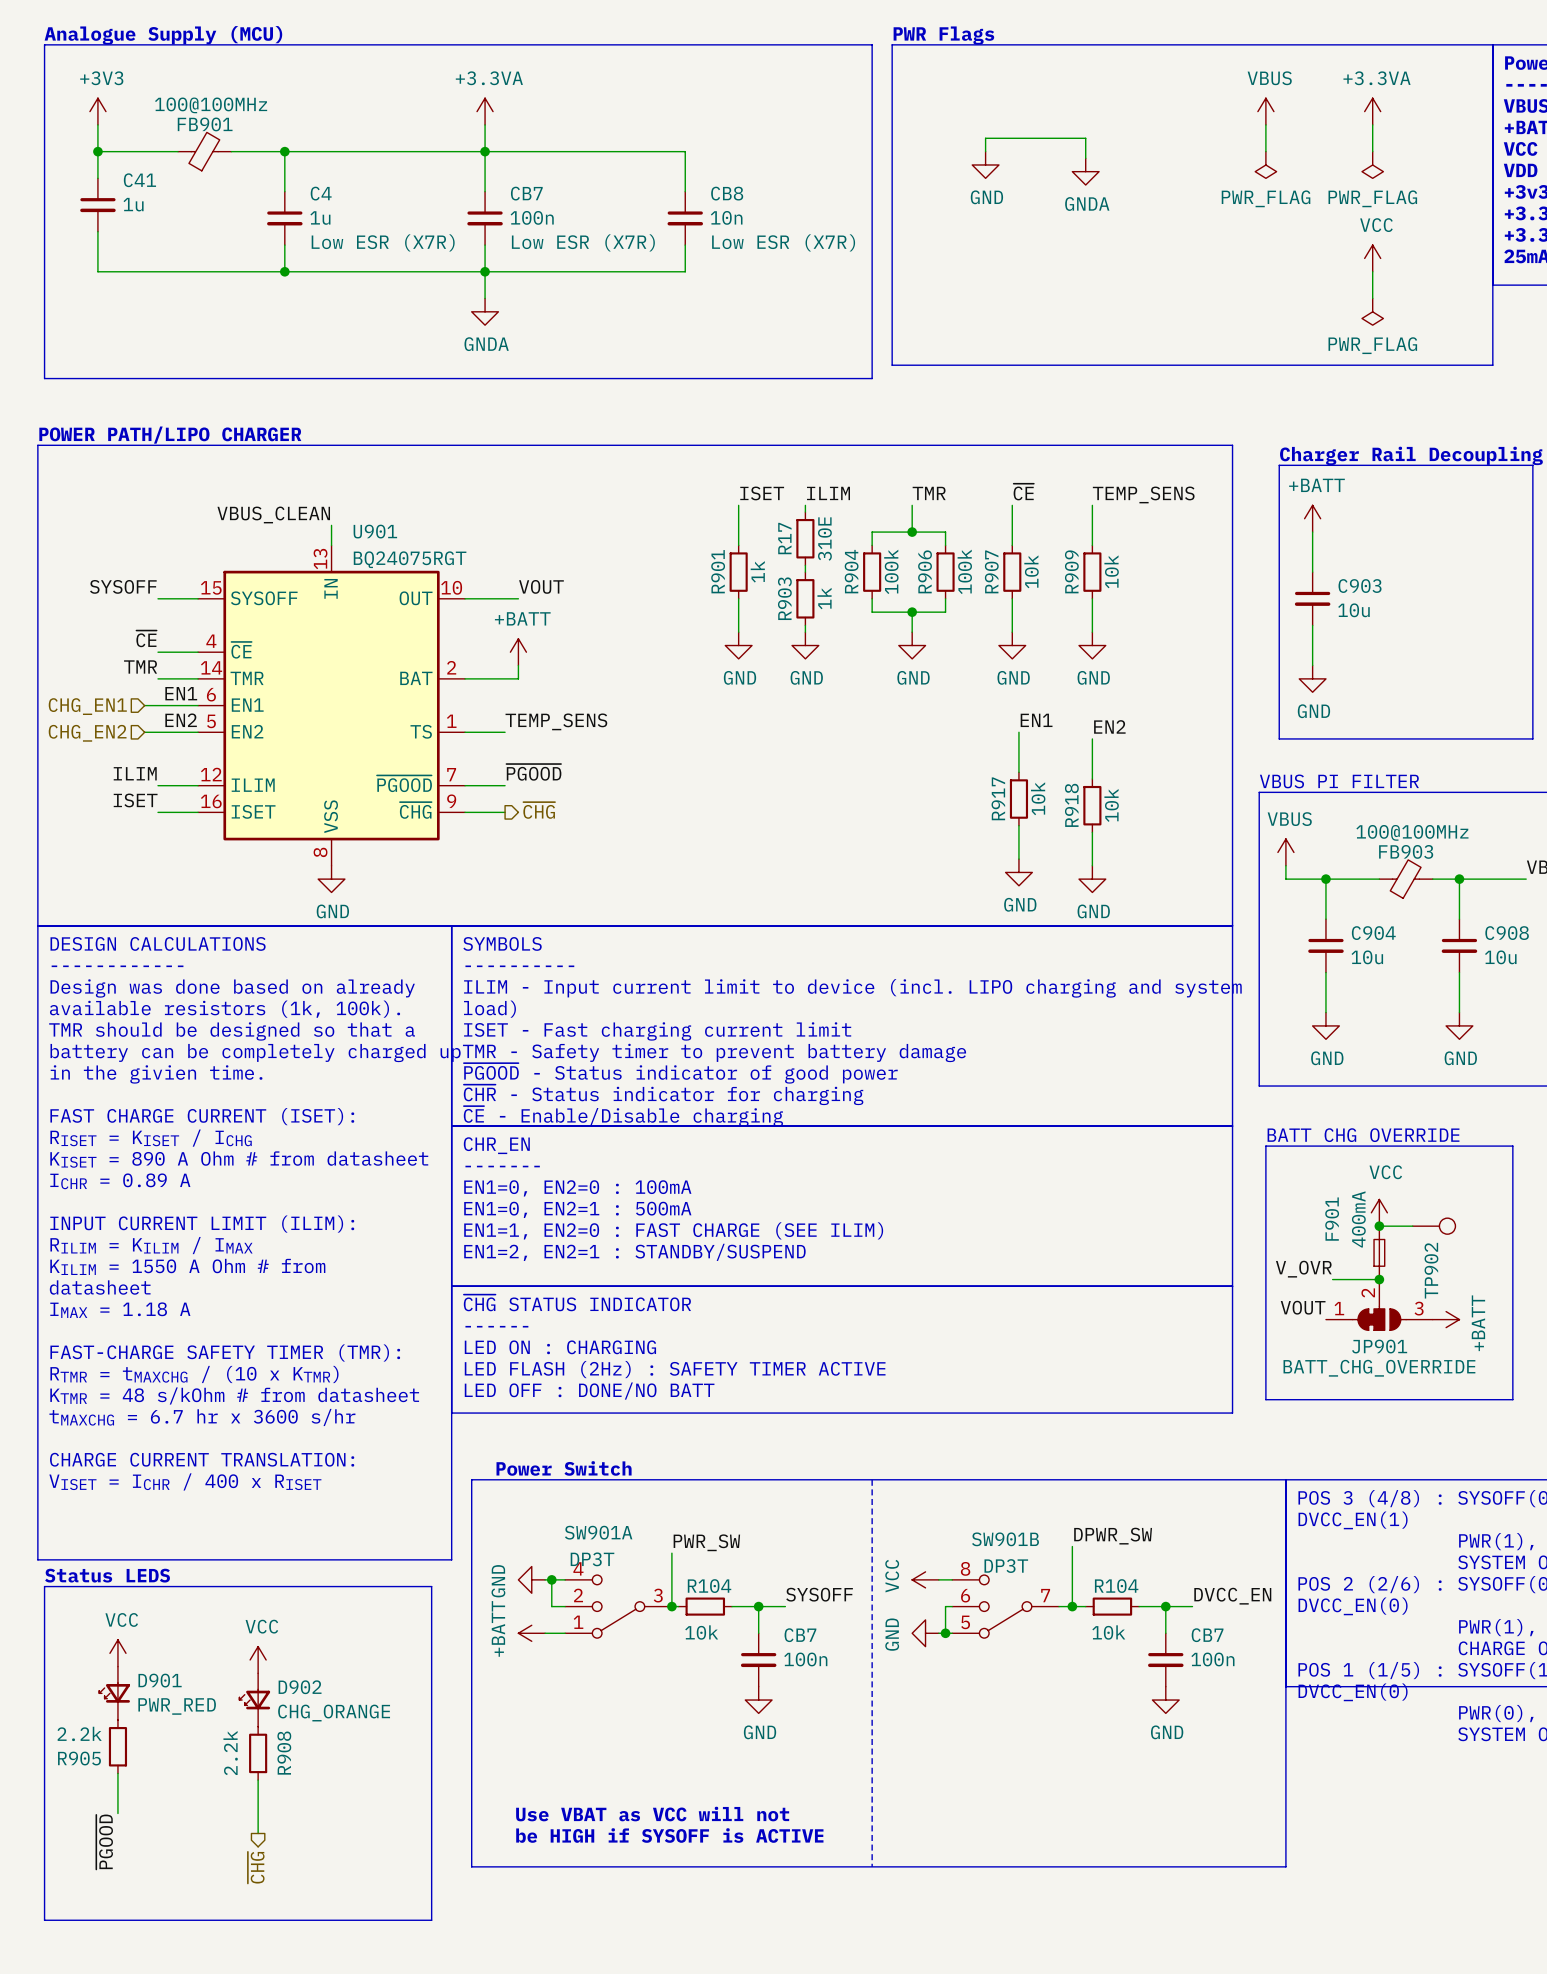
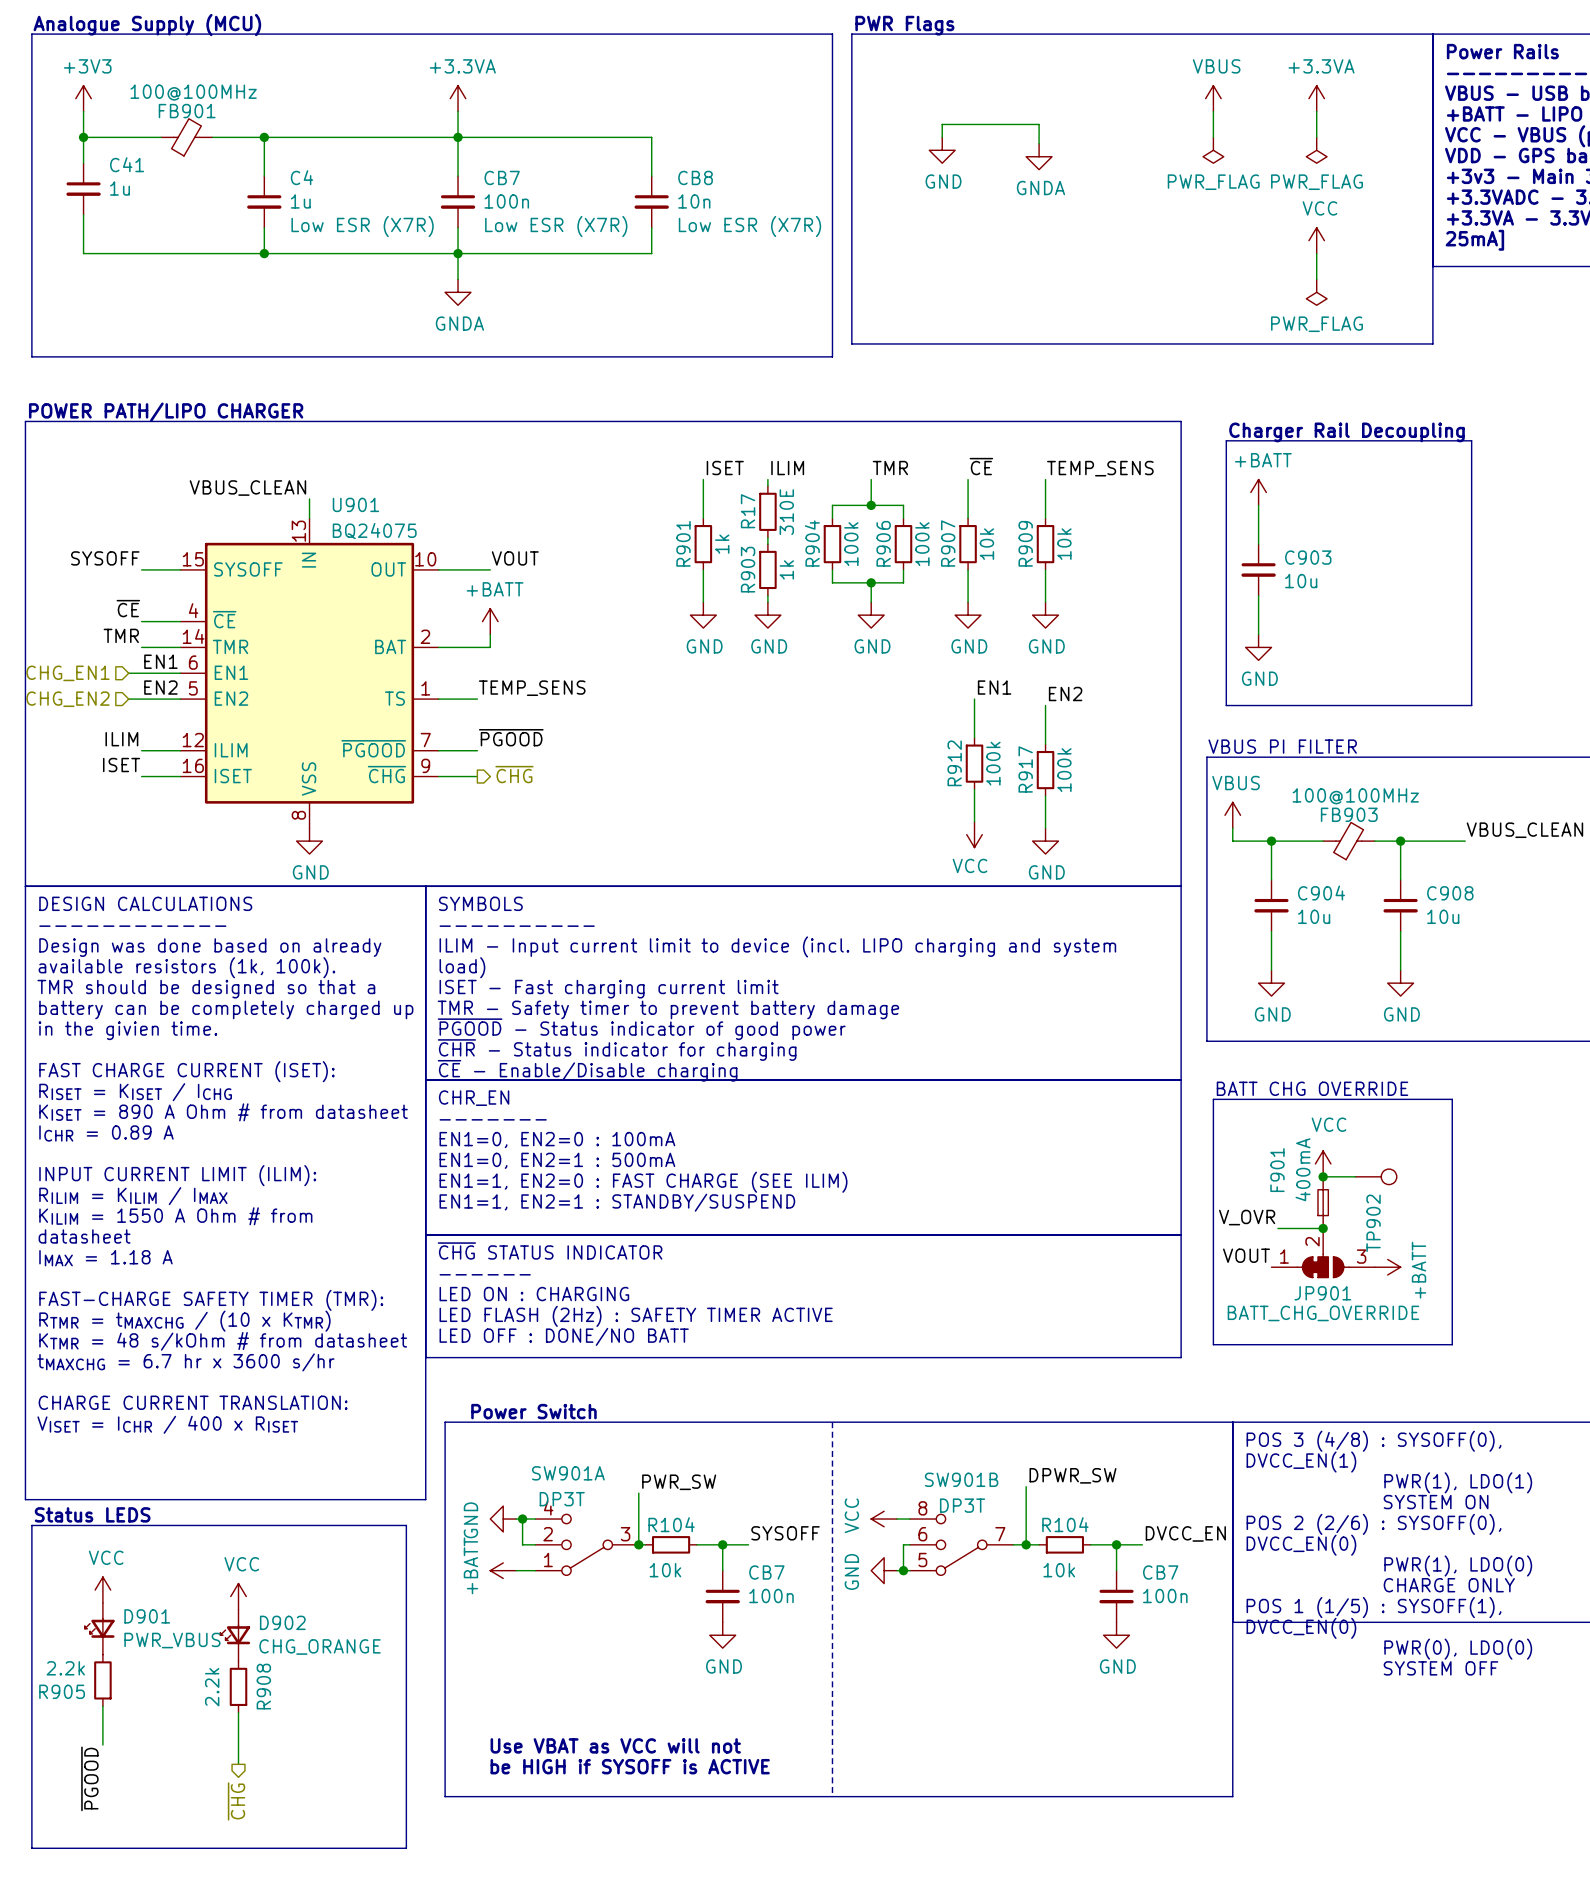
U901 value: BQ24075RGT (410, 559) -> BQ24075 (374, 531)
R917 name: R917 (998, 798) -> R912 (954, 763)
R917 value: 10k (1038, 798) -> 100k (993, 763)
R918 name: R918 (1071, 805) -> R917 (1025, 769)
R918 value: 10k (1111, 805) -> 100k (1064, 770)
power symbol: GND (1018, 872) -> VCC (974, 834)
text: EN1=2, EN2=1 : STANDBY/SUSPEND (634, 1252) -> EN1=1, EN2=1 : STANDBY/SUSPEND (617, 1202)
D901 value: PWR_RED (177, 1706) -> PWR_VBUS (172, 1640)

